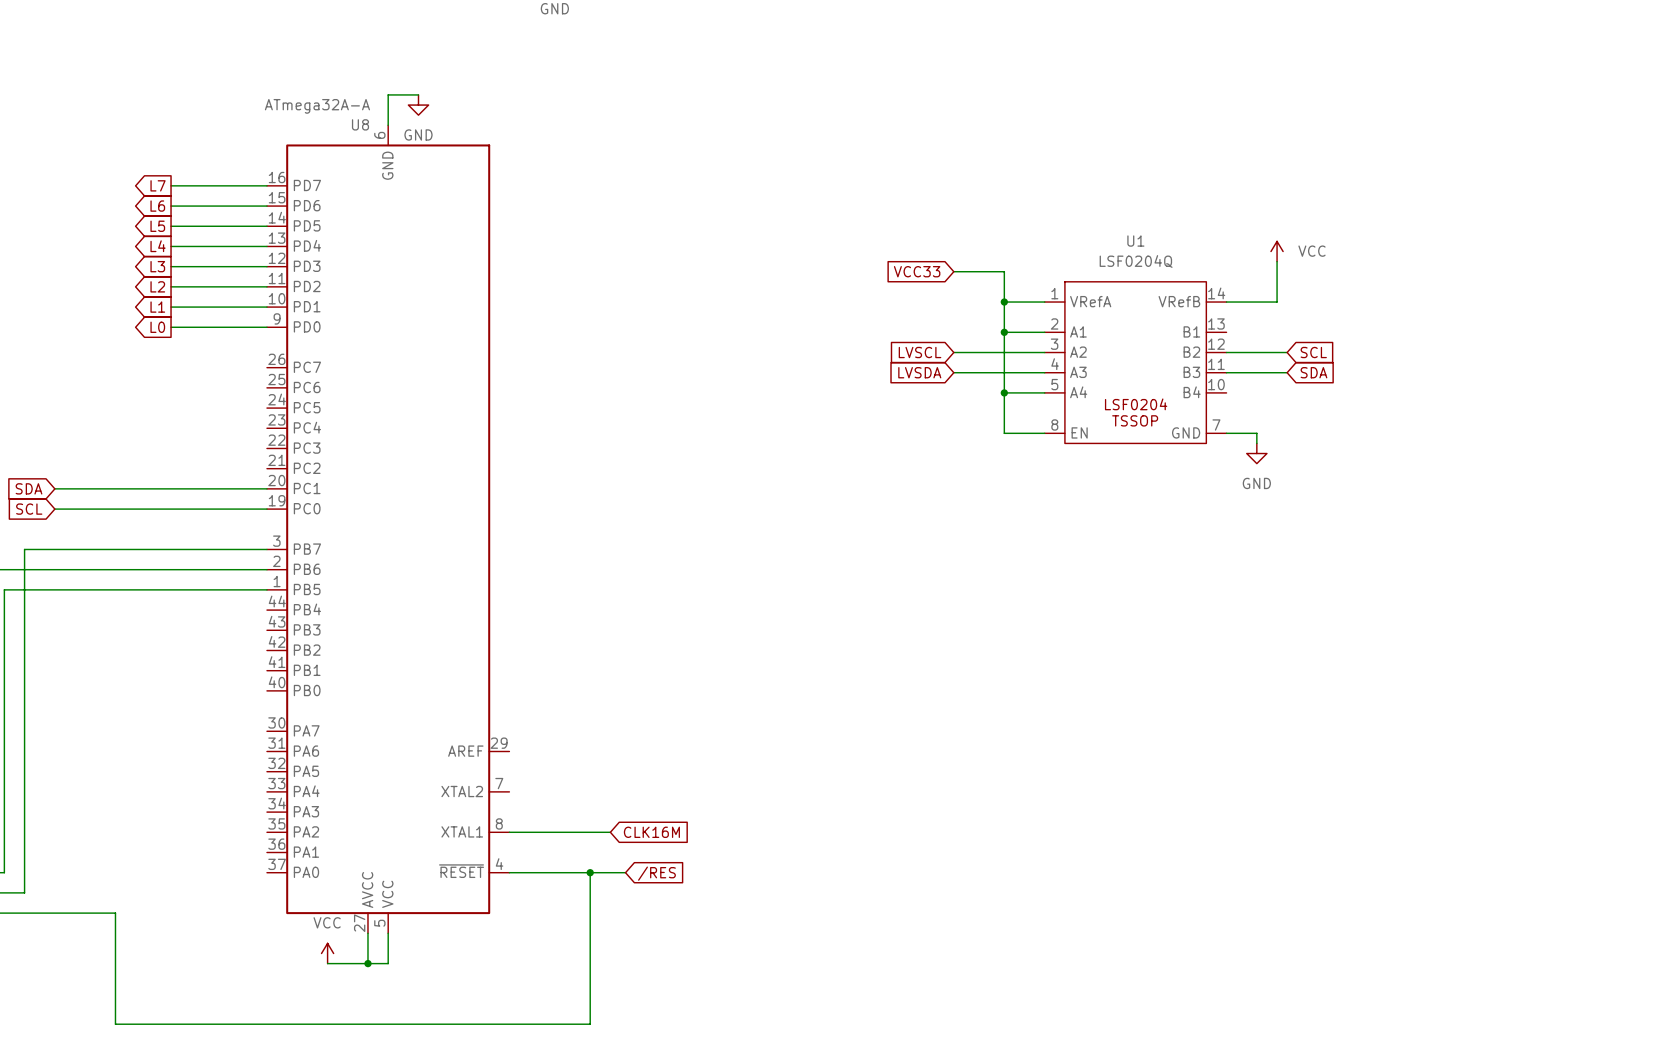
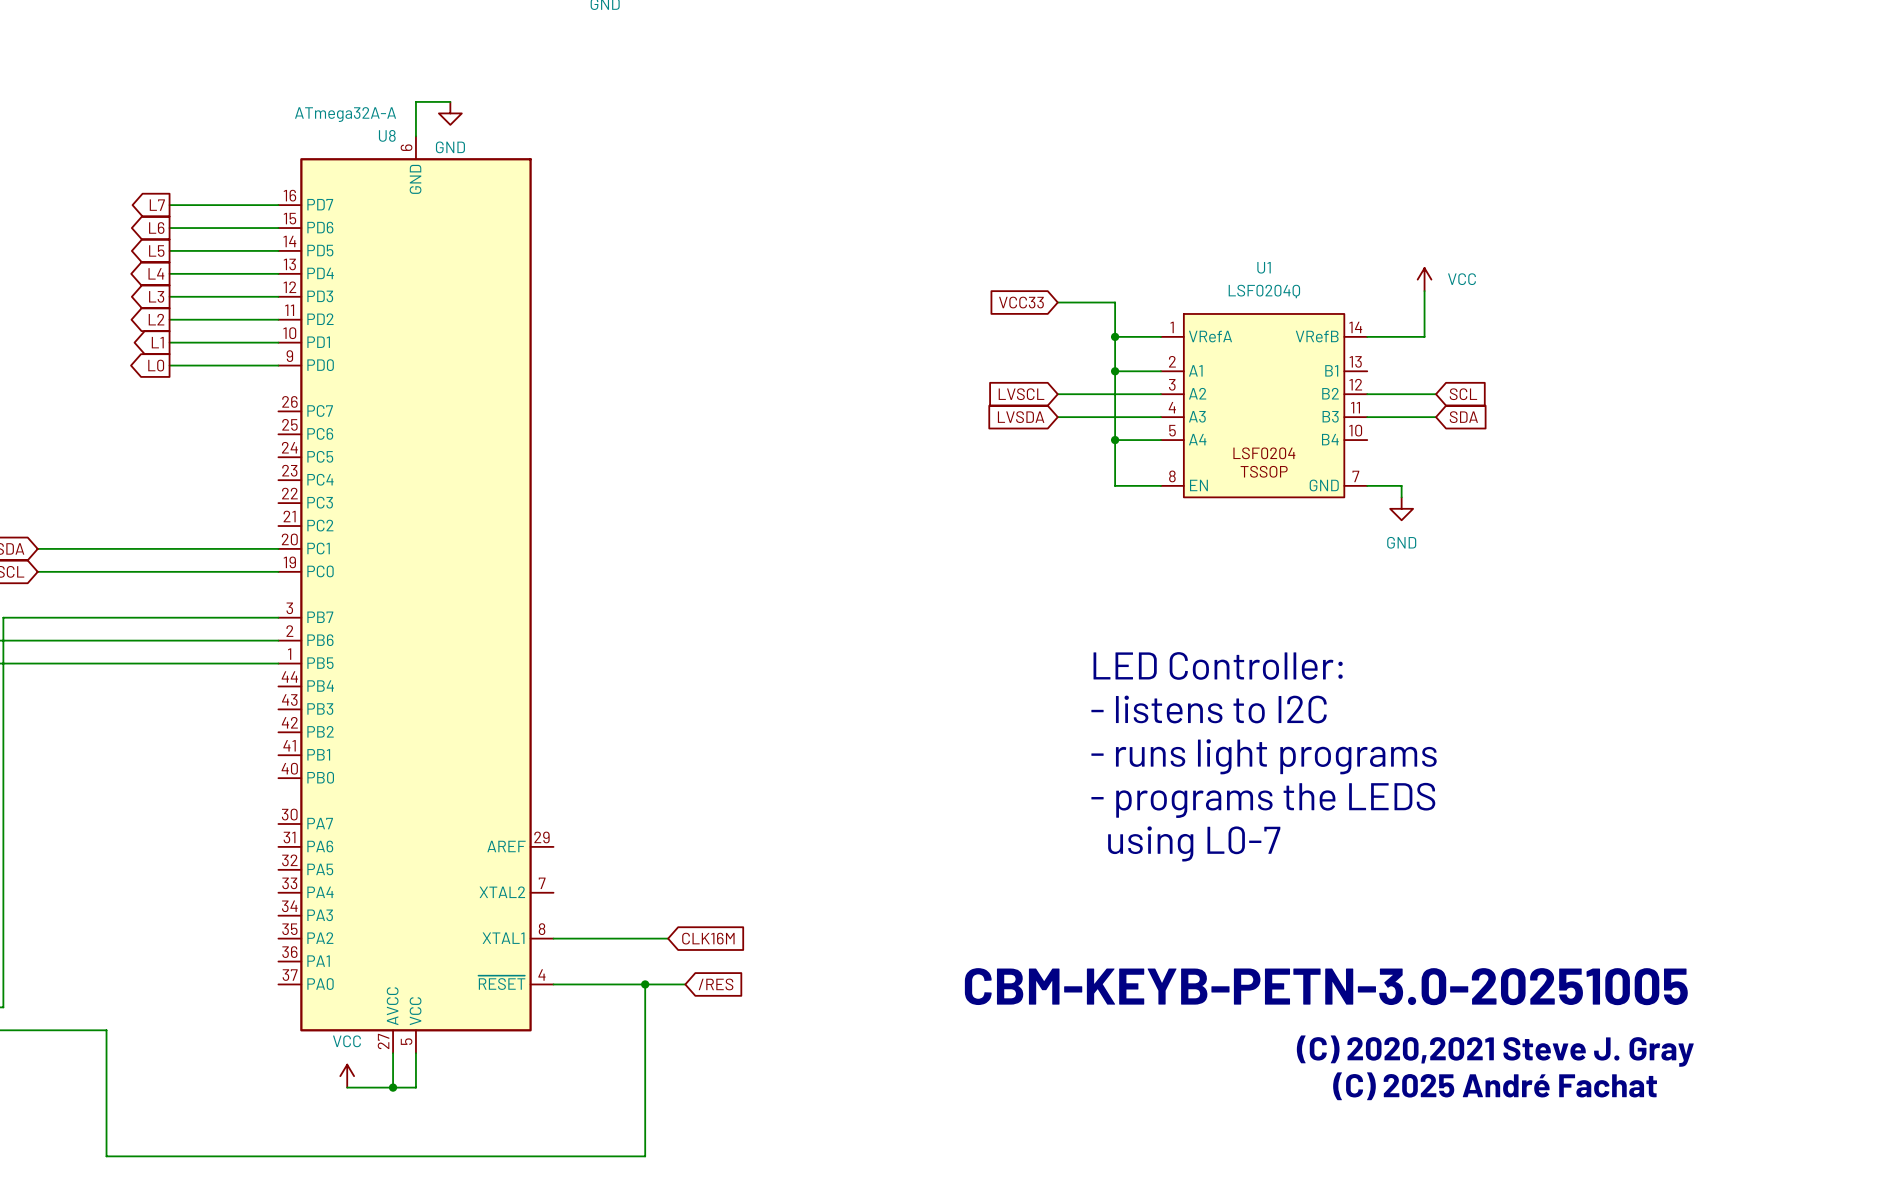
text: none -> LED Controller: (1218, 665)
text: none -> - listens to I2C (1209, 709)
text: none -> - runs light programs (1264, 756)
text: none -> - programs the LEDS (1263, 800)
text: none -> using L0-7 (1194, 843)
text: none -> CBM-KEYB-PETN-3.0-20251005 (1326, 986)
text: none -> (C) 2020,2021 Steve J. Gray (1495, 1051)
text: none -> (C) 2025 André Fachat (1495, 1086)

